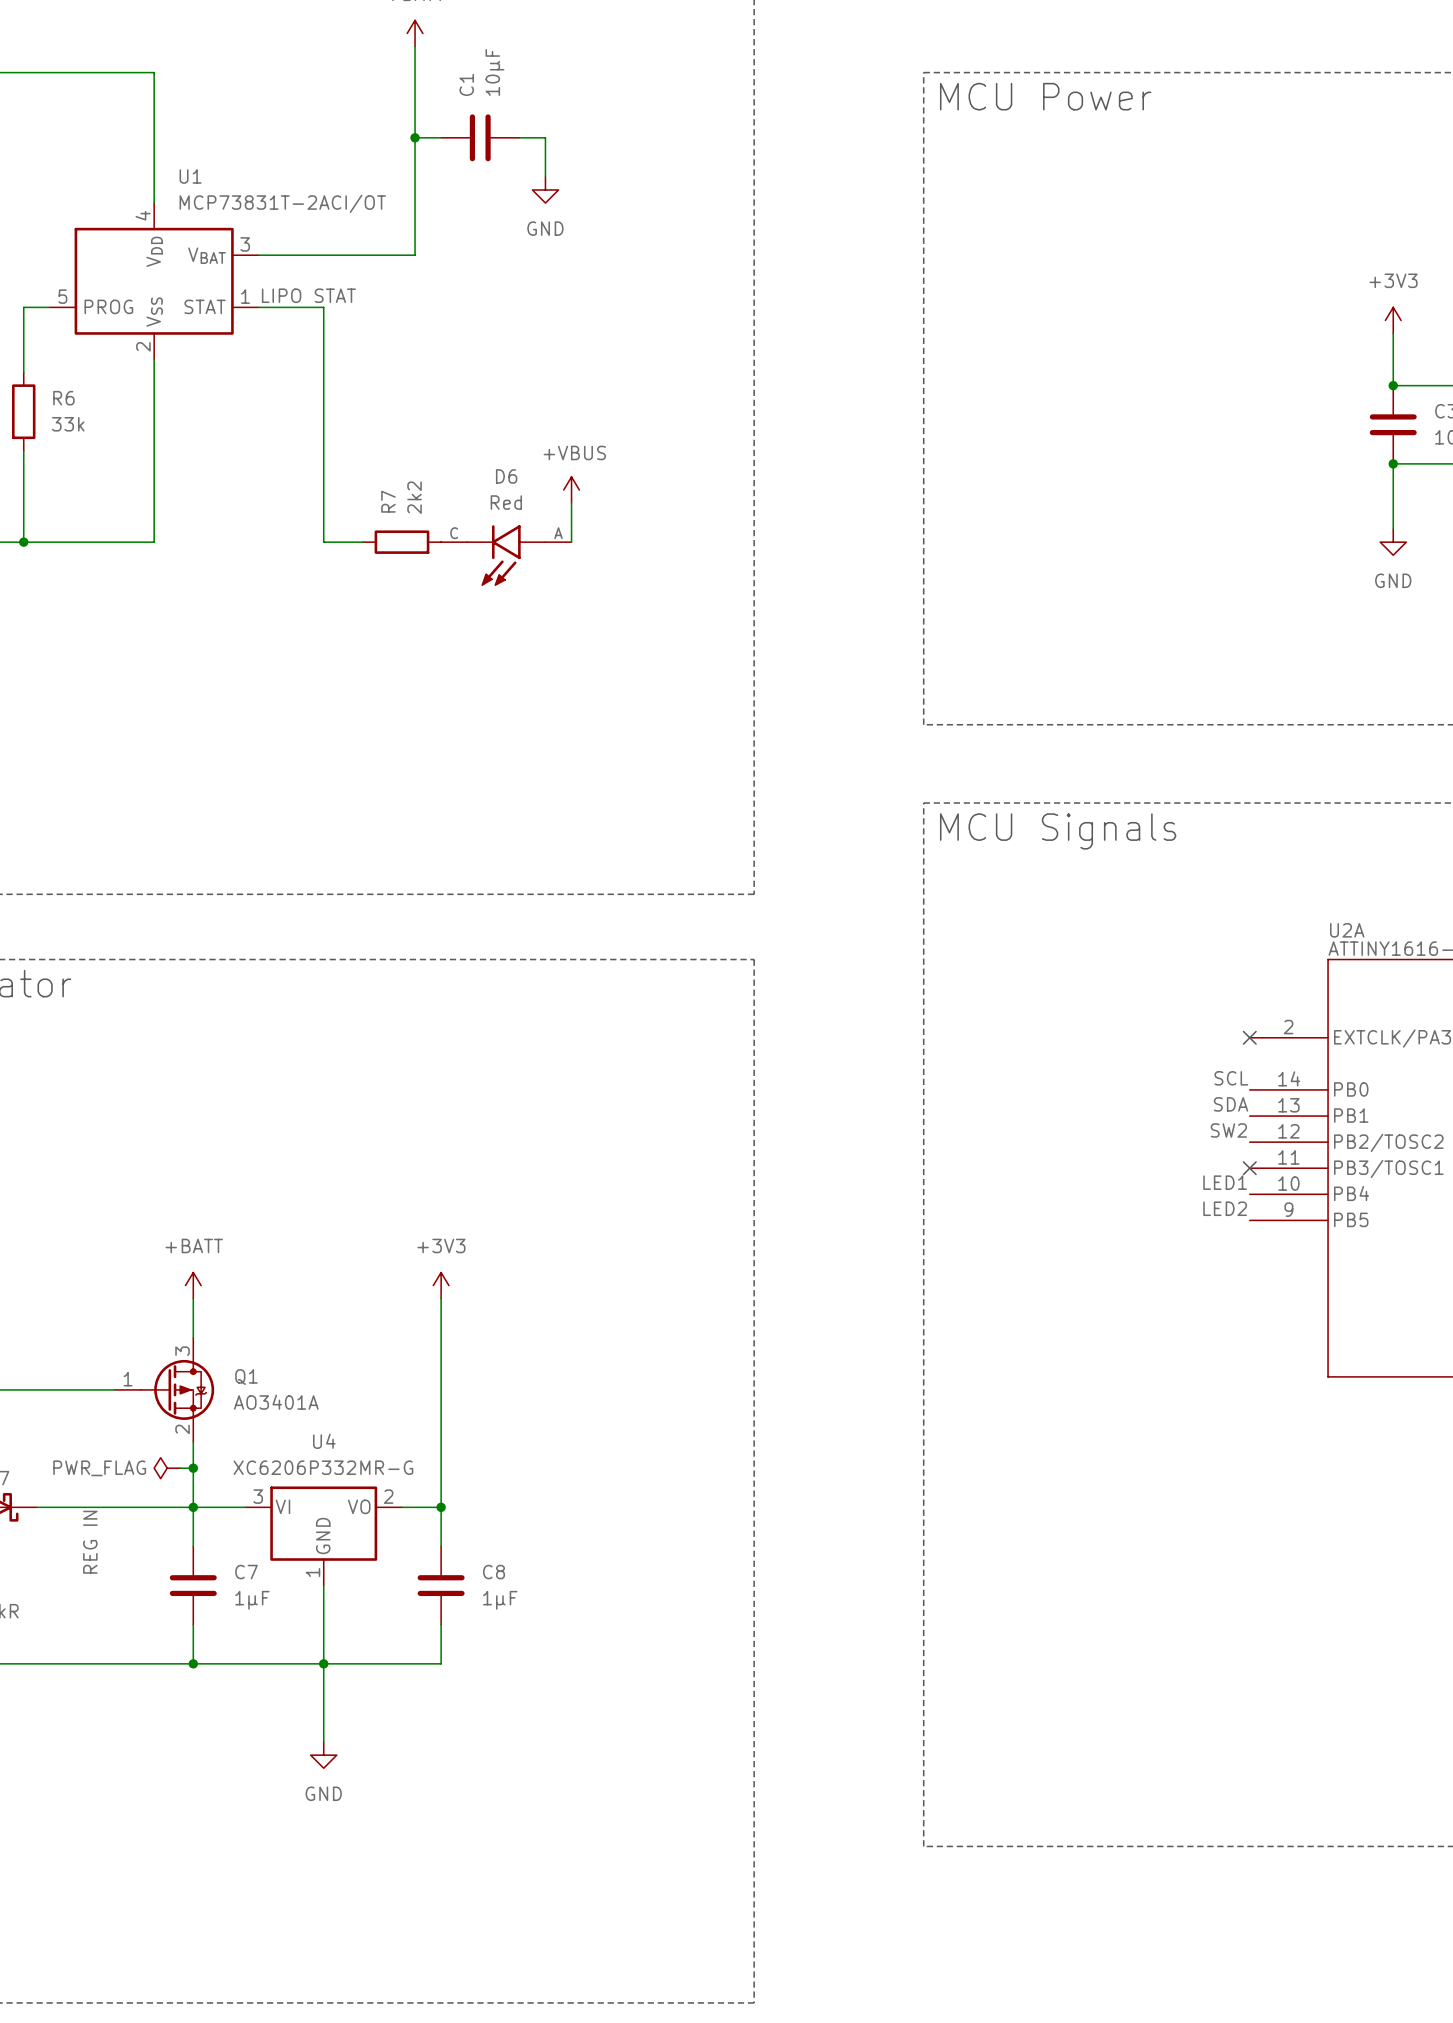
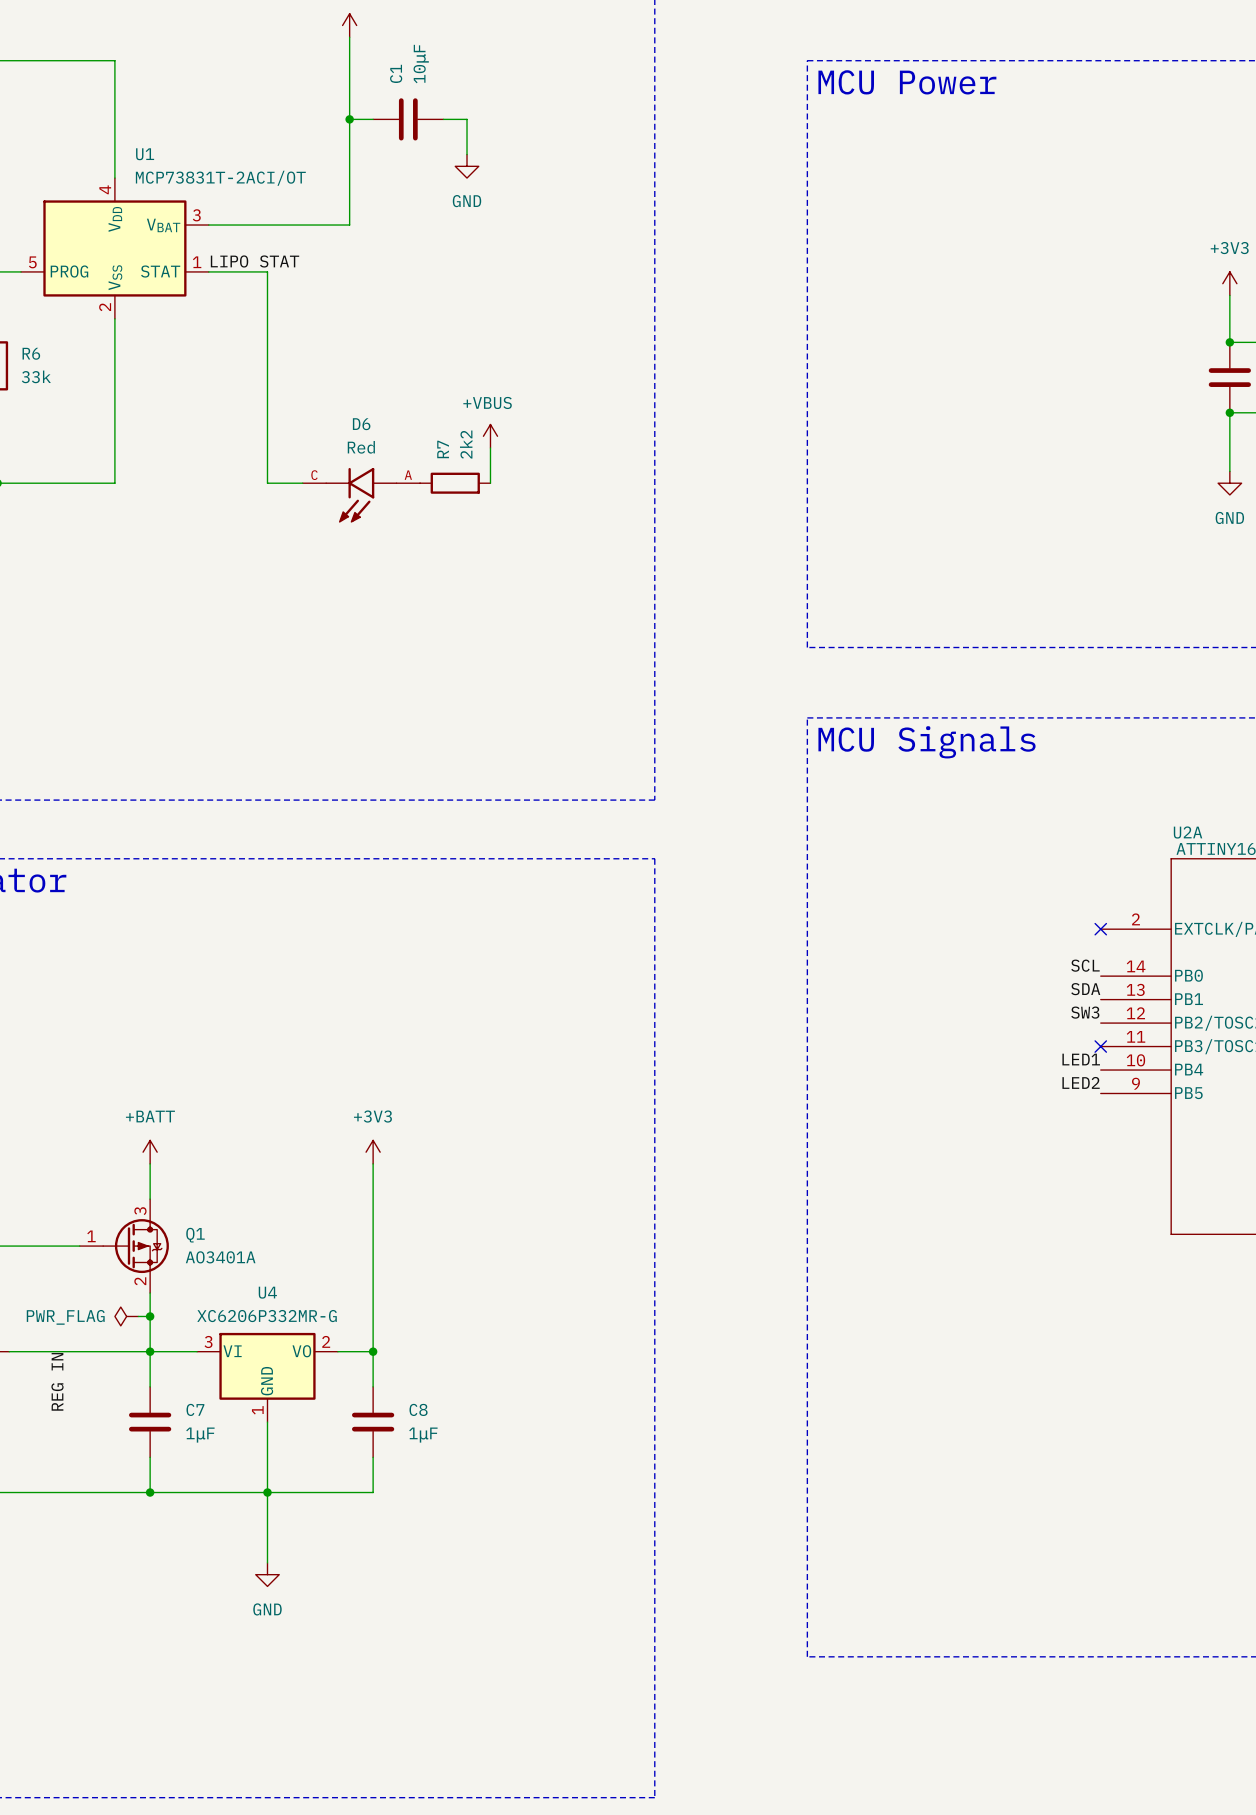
R7 position: (401, 542) -> (455, 483)
D6 position: (506, 555) -> (361, 495)
label: SW2 (1228, 1130) -> SW3 (1085, 1012)

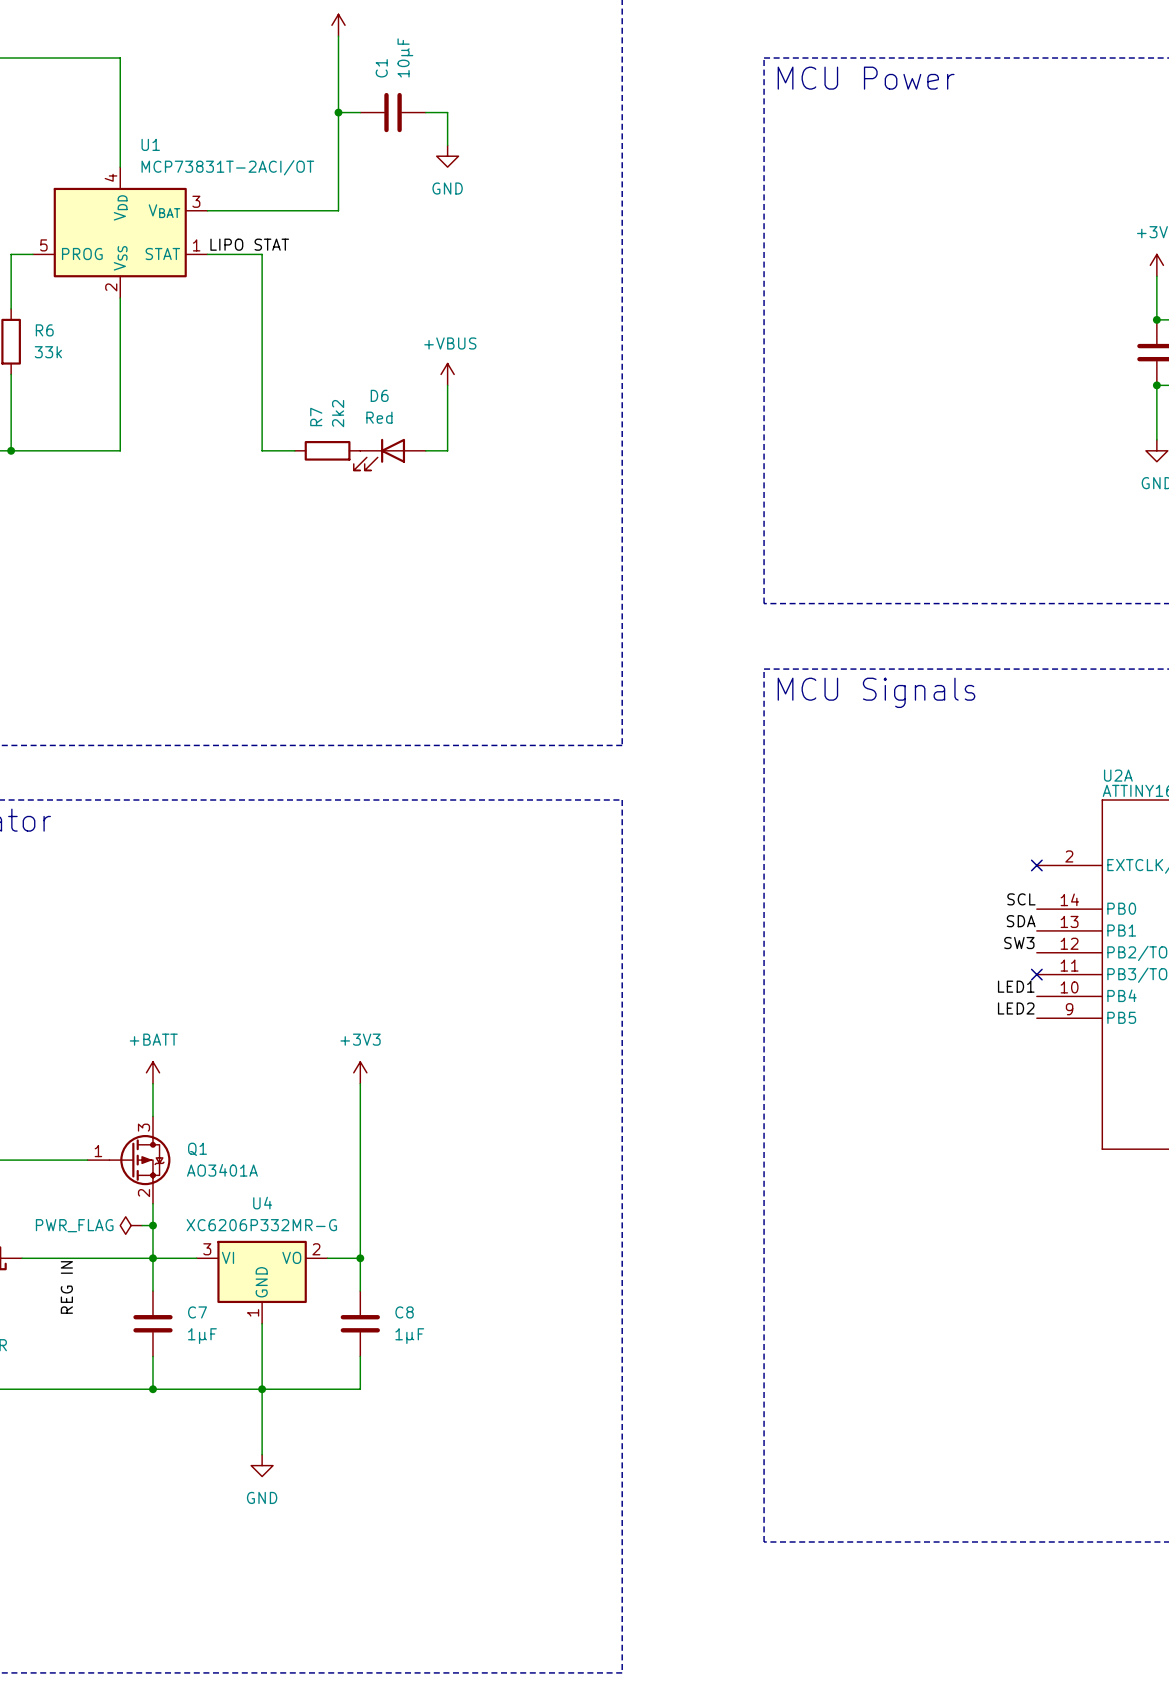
wire: none -> (447, 385) (447, 450) (425, 450)
power symbol position: +VBUS (490, 436) -> +VBUS (447, 374)
wire: (490, 447) (490, 483) -> none
D6 symbol: [302, 467, 421, 523] -> [353, 438, 426, 471]
R7 position: (455, 483) -> (327, 450)

